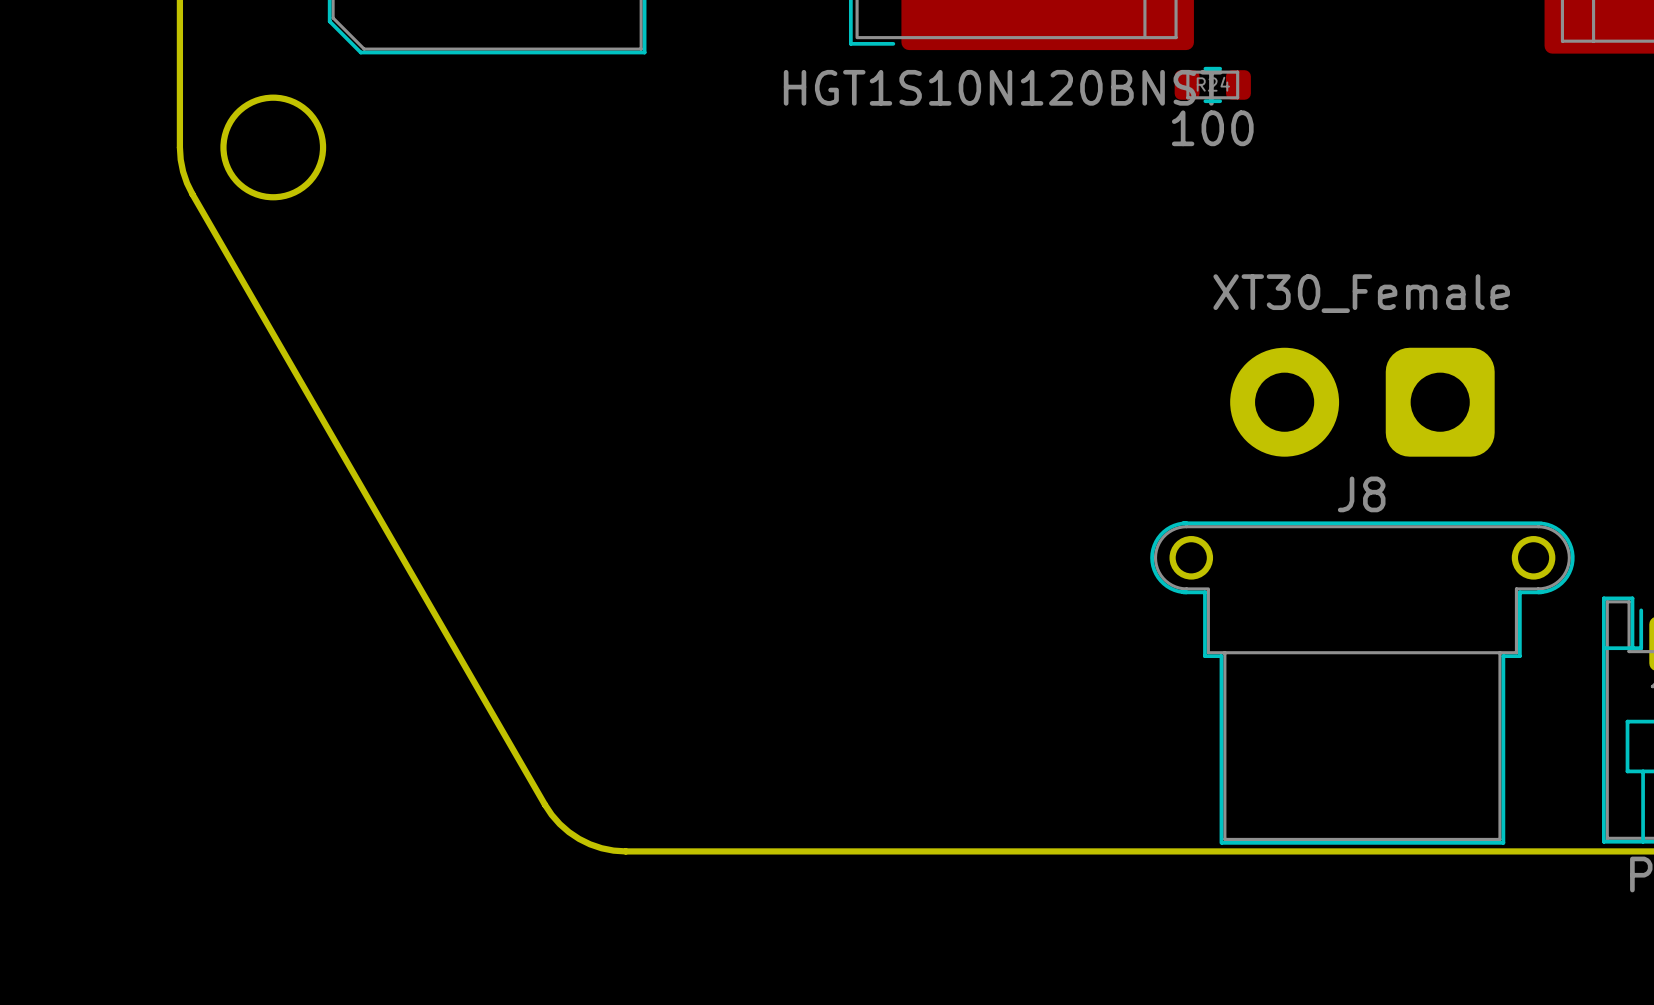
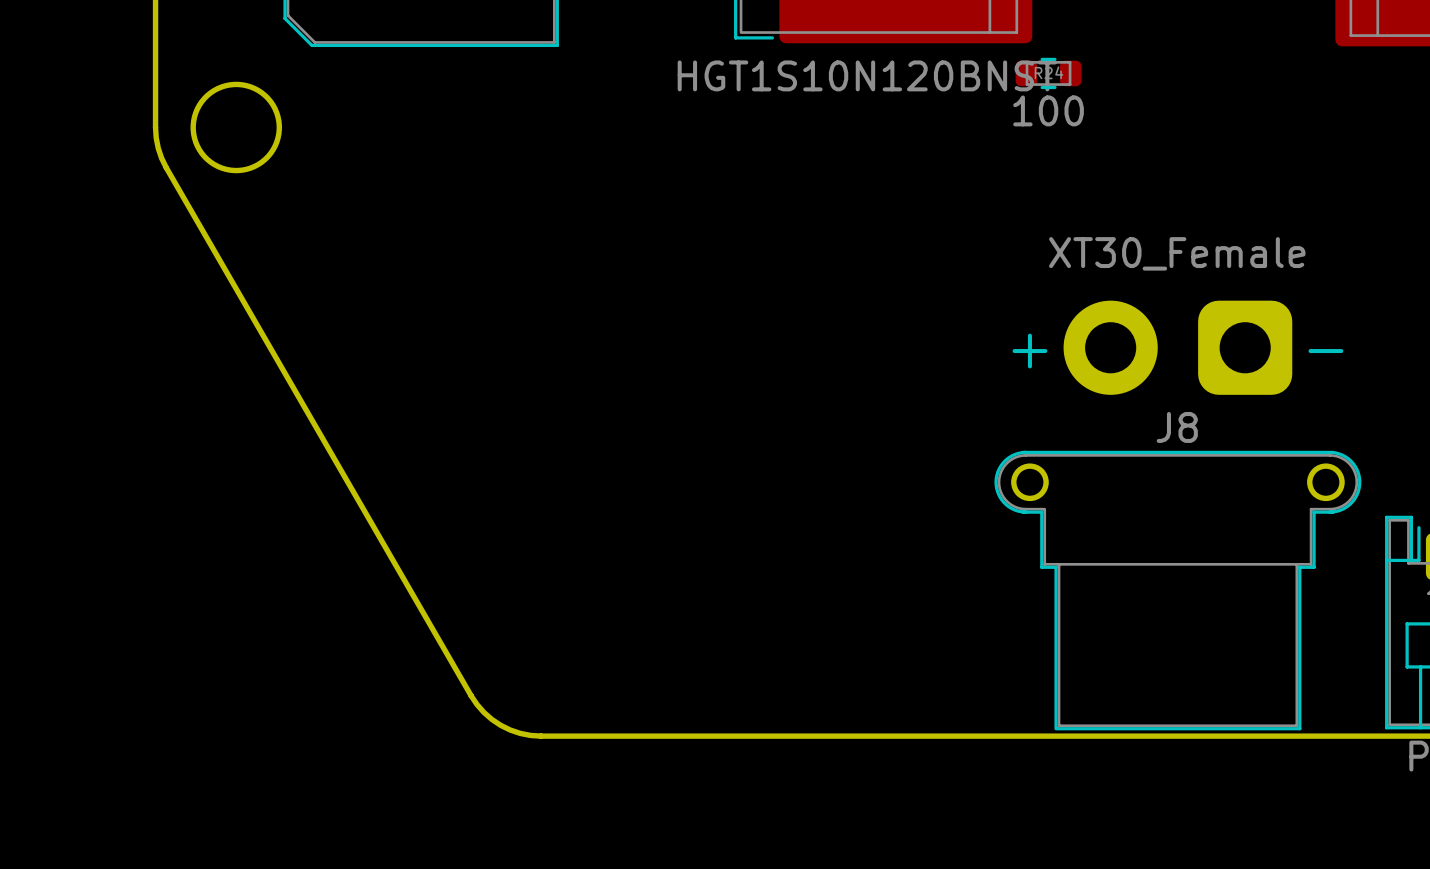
J8 text: none -> + (1029, 351)
J8 text: none -> - (1325, 351)

